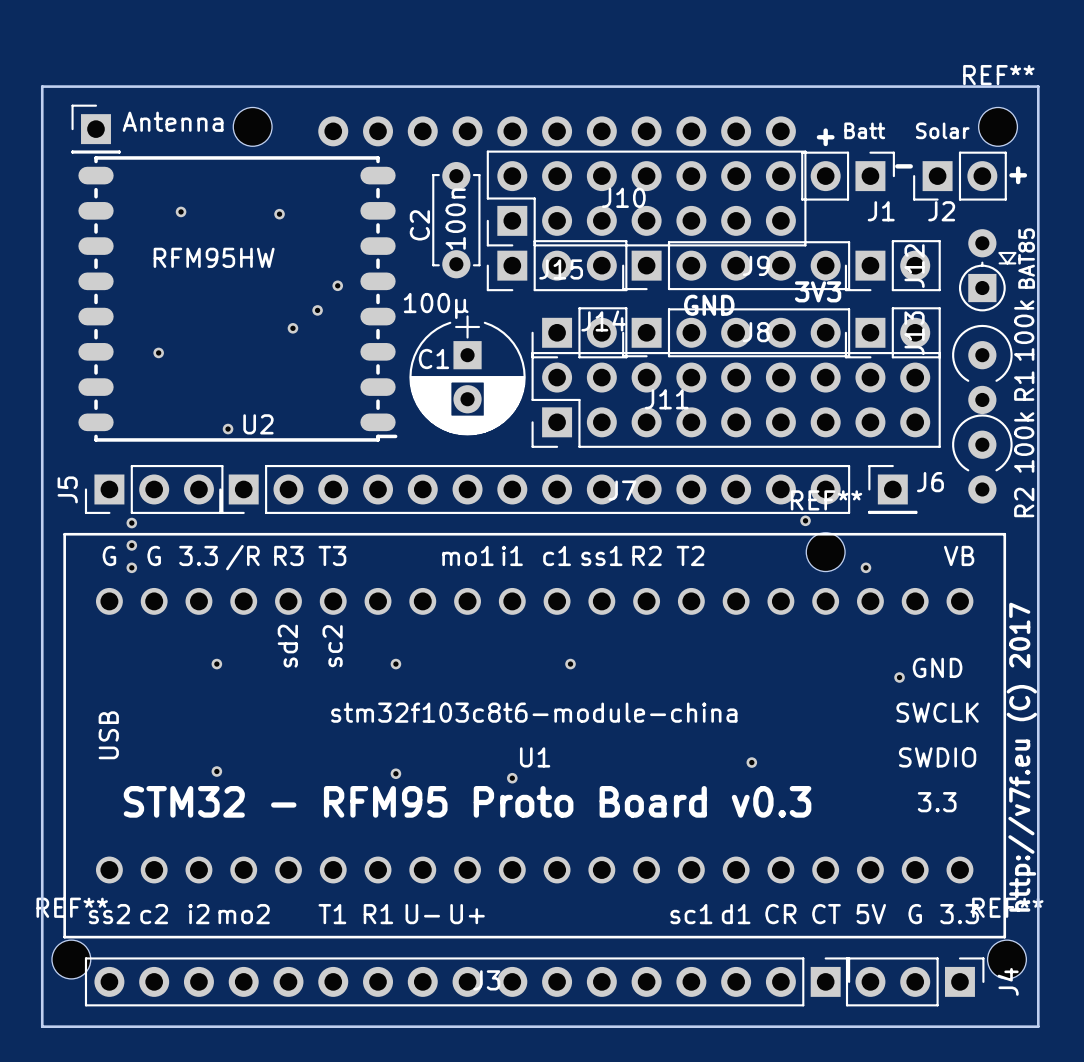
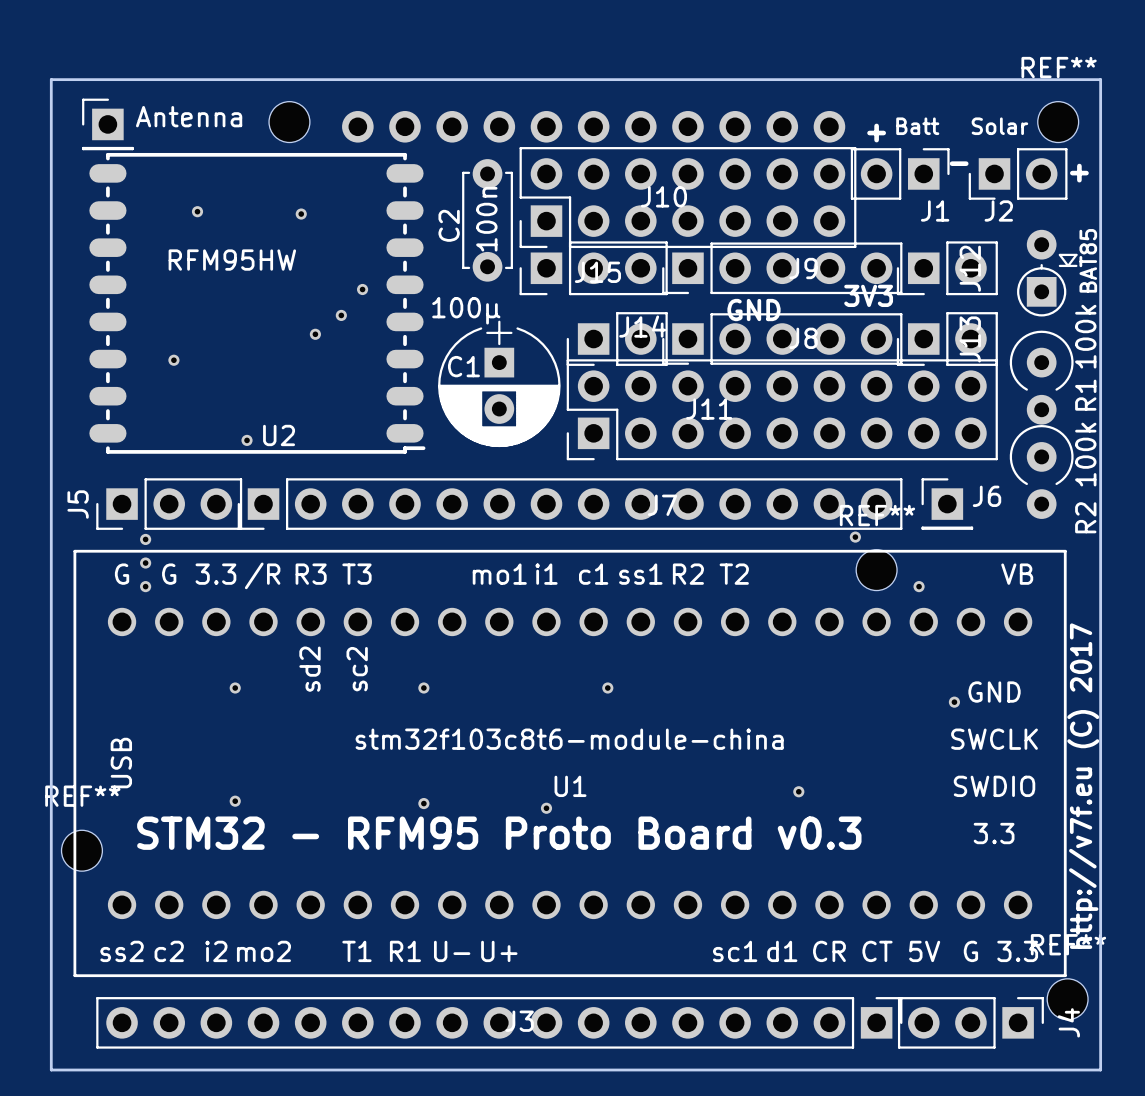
part position: (252, 126) -> (289, 122)
REF** position: (71, 959) -> (81, 850)

